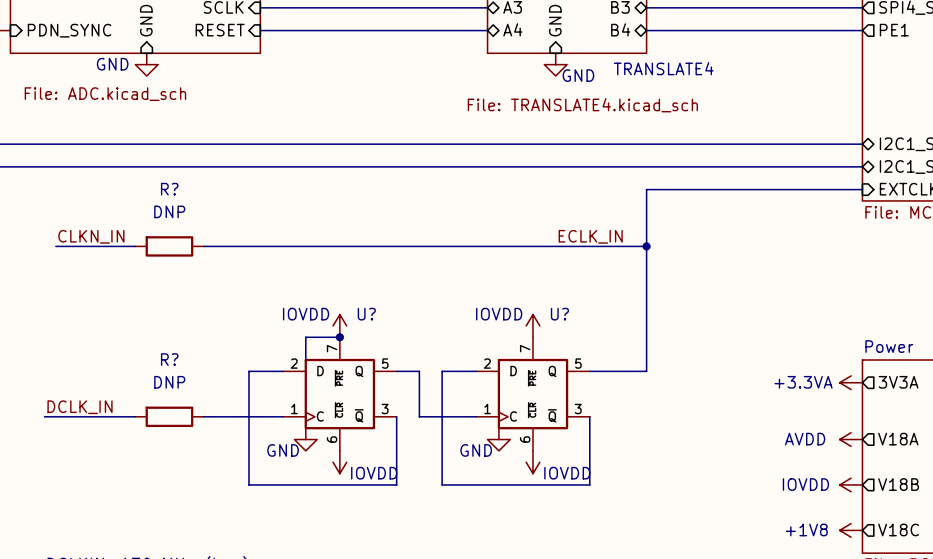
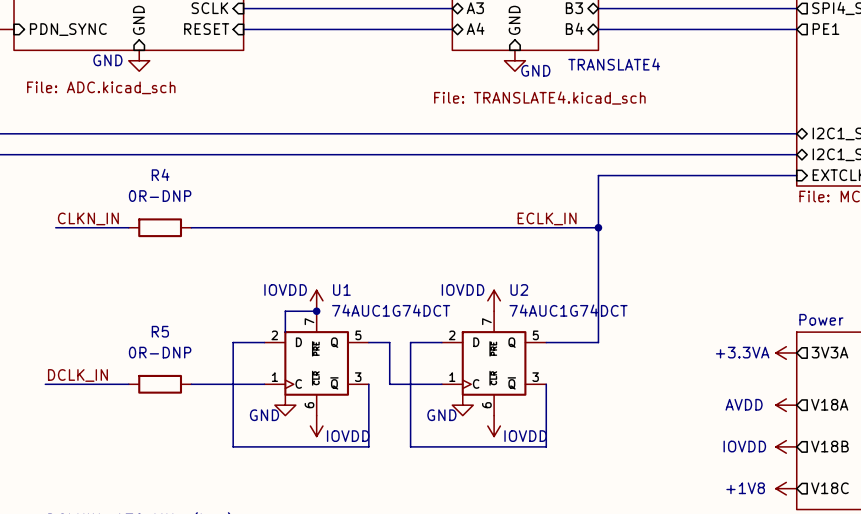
R? name: R? (169, 189) -> R4 (160, 174)
R? value: DNP (169, 211) -> 0R-DNP (160, 196)
U? name: U? (366, 314) -> U1 (341, 289)
U? name: U? (559, 314) -> U2 (519, 289)
U? value: none -> 74AUC1G74DCT (391, 310)
U? value: none -> 74AUC1G74DCT (568, 310)
R? name: R? (169, 359) -> R5 (160, 331)
R? value: DNP (169, 382) -> 0R-DNP (160, 352)

